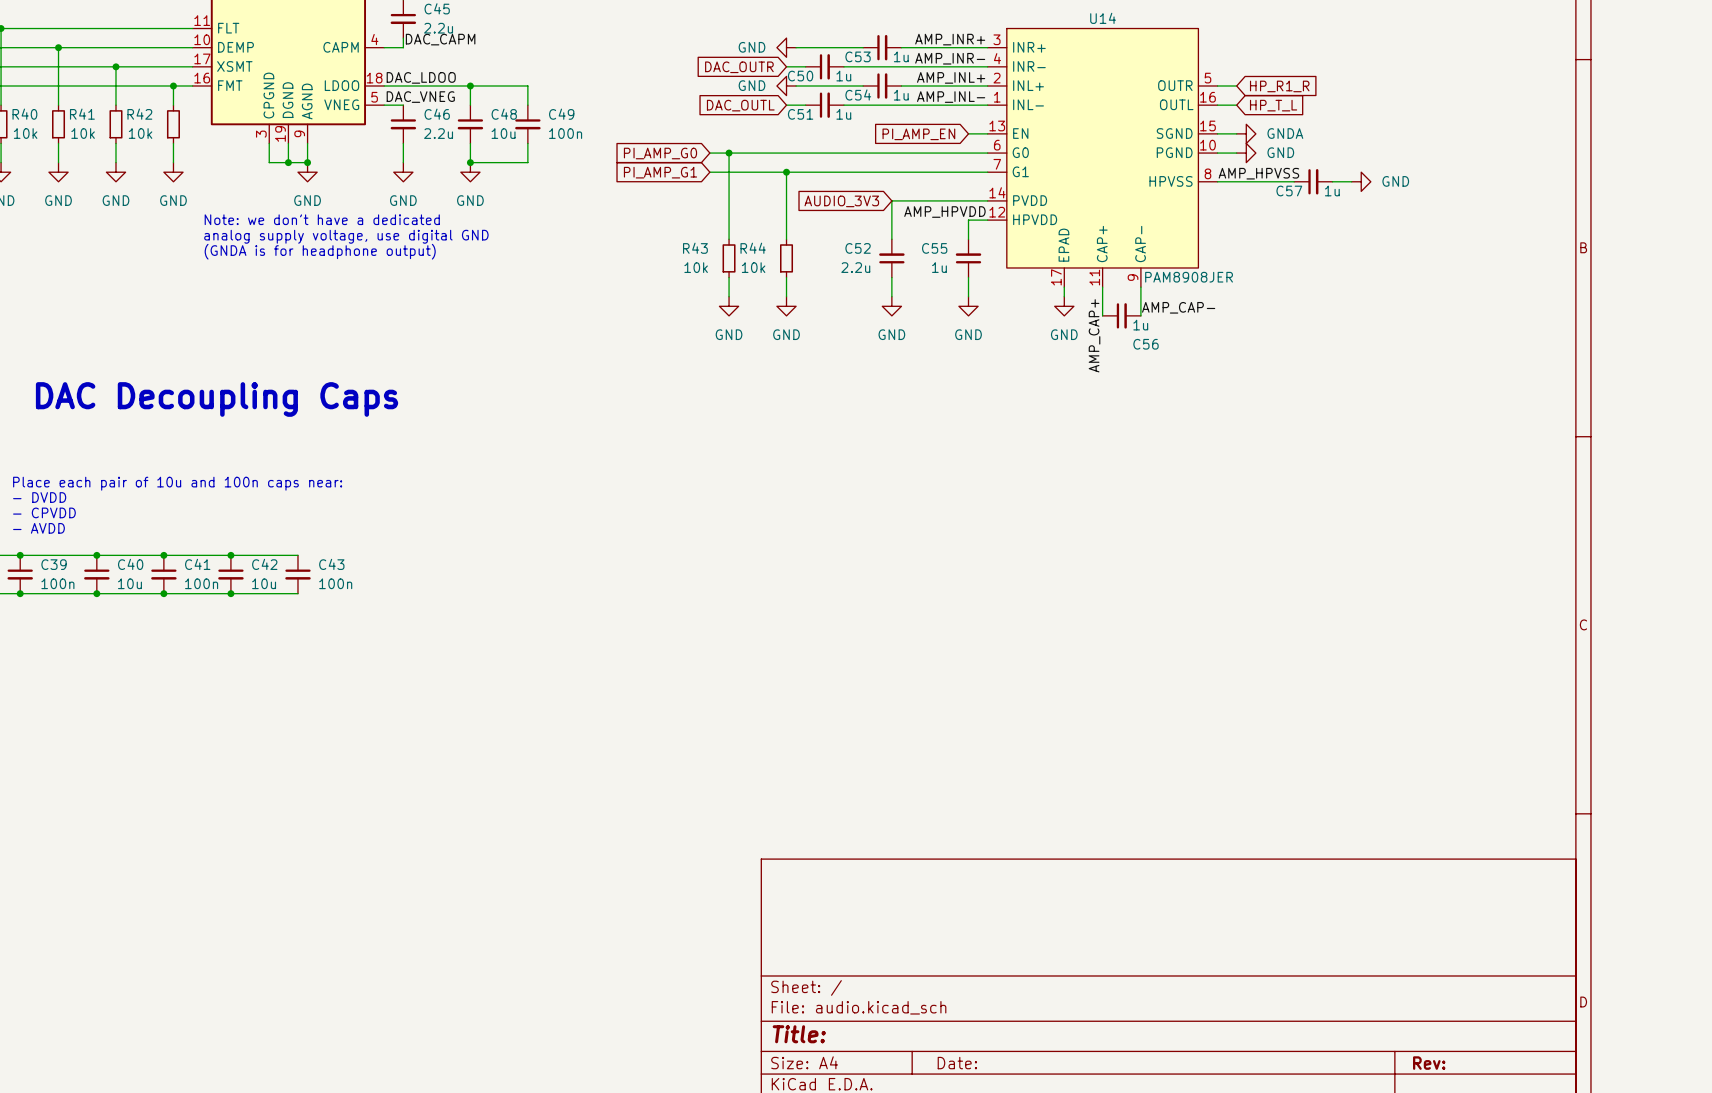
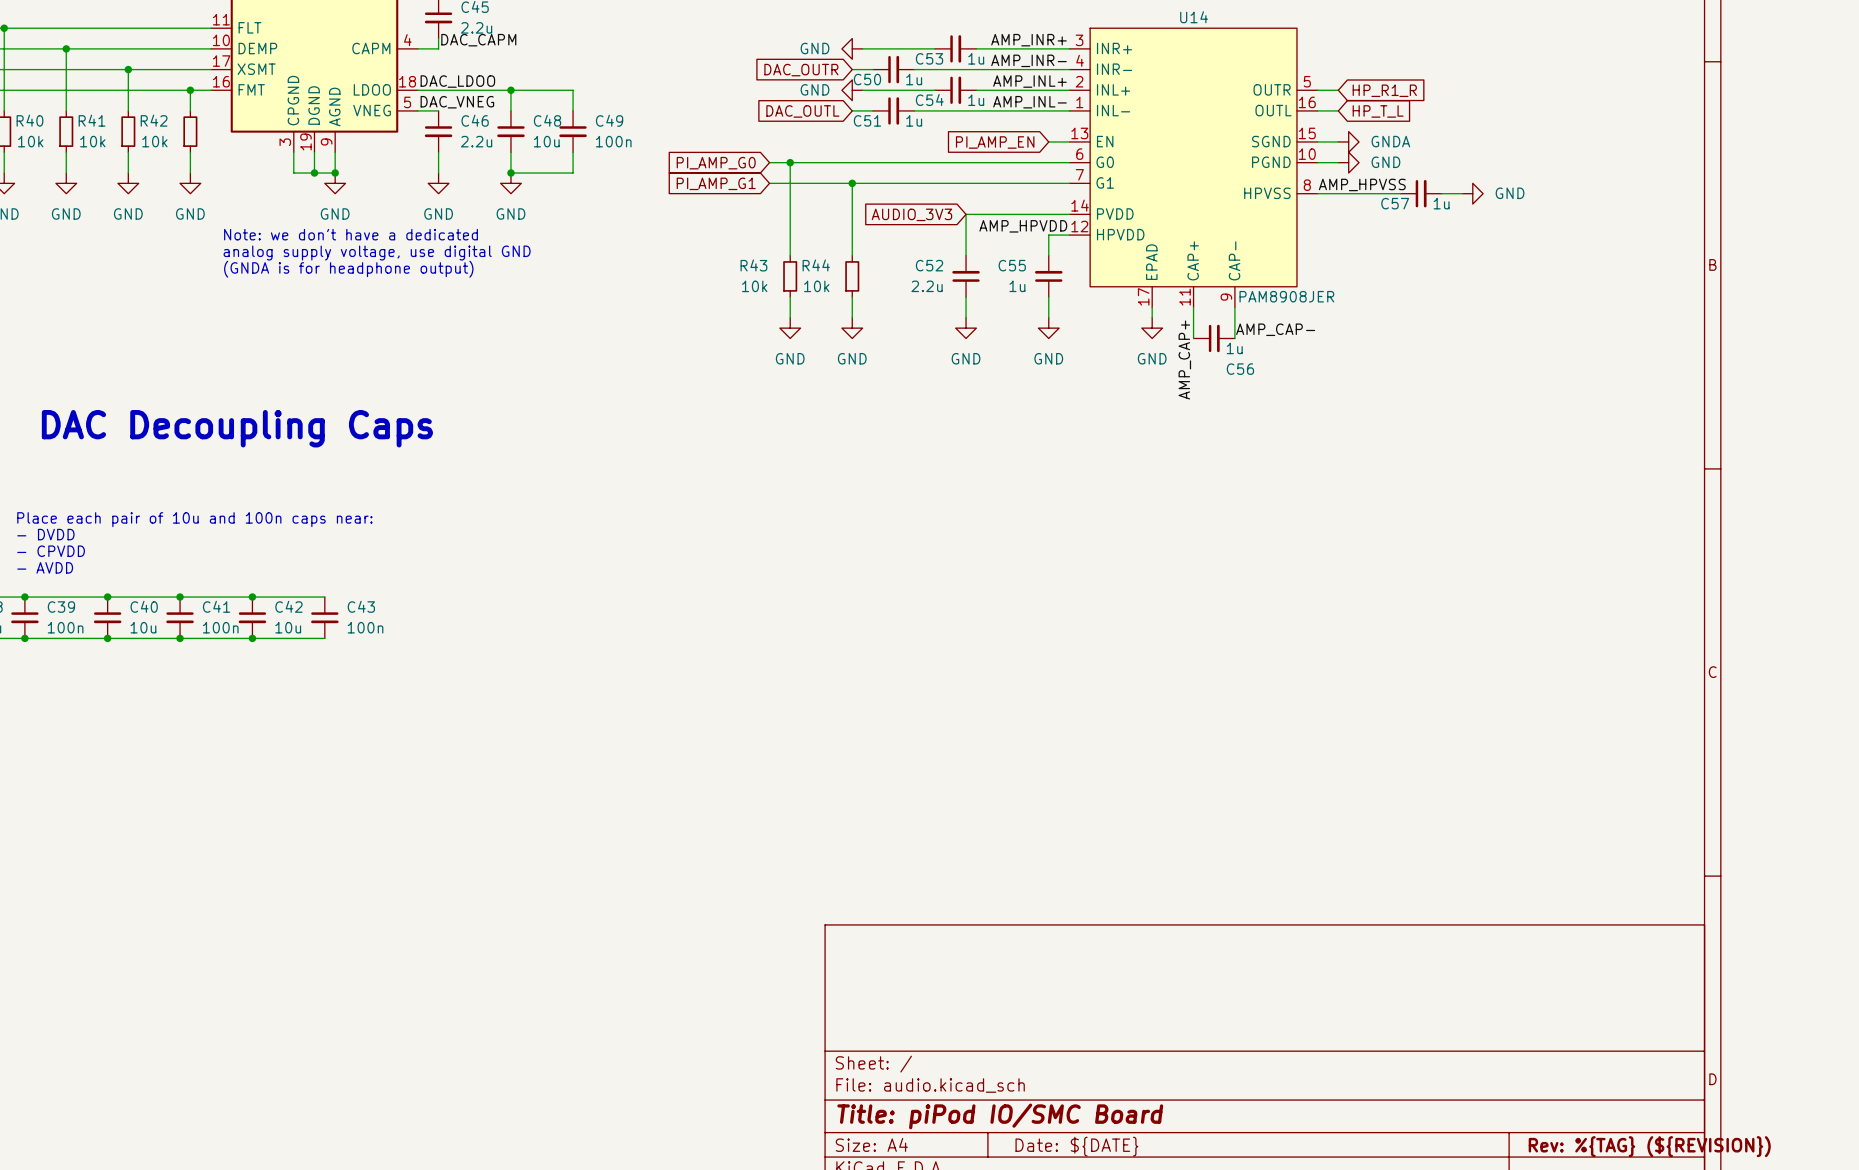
title block: Title: (799, 1034) -> Title: piPod IO/SMC Board (1000, 1116)
title block: Date: (957, 1063) -> Date: ${DATE} (1076, 1146)
title block: Rev: (1429, 1063) -> Rev: %{TAG} (${REVISION}) (1649, 1146)

